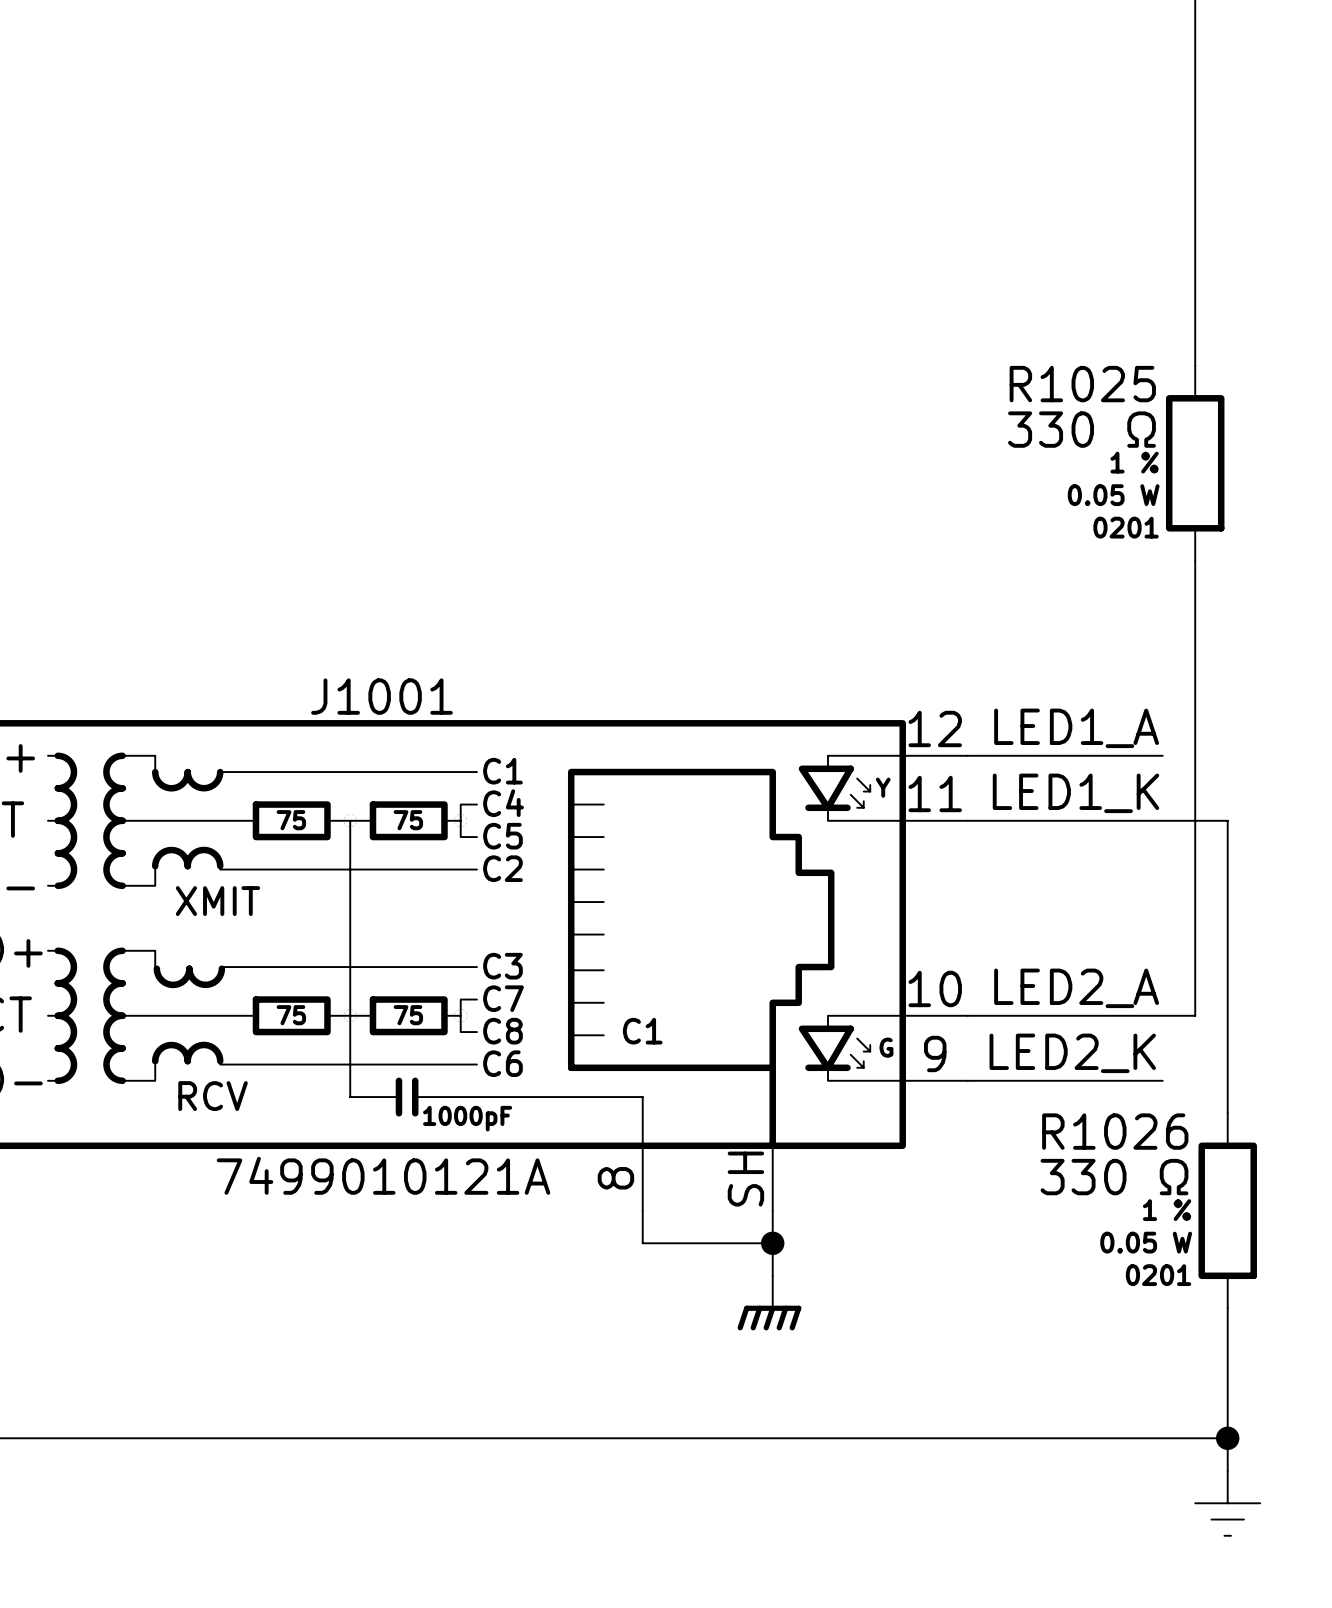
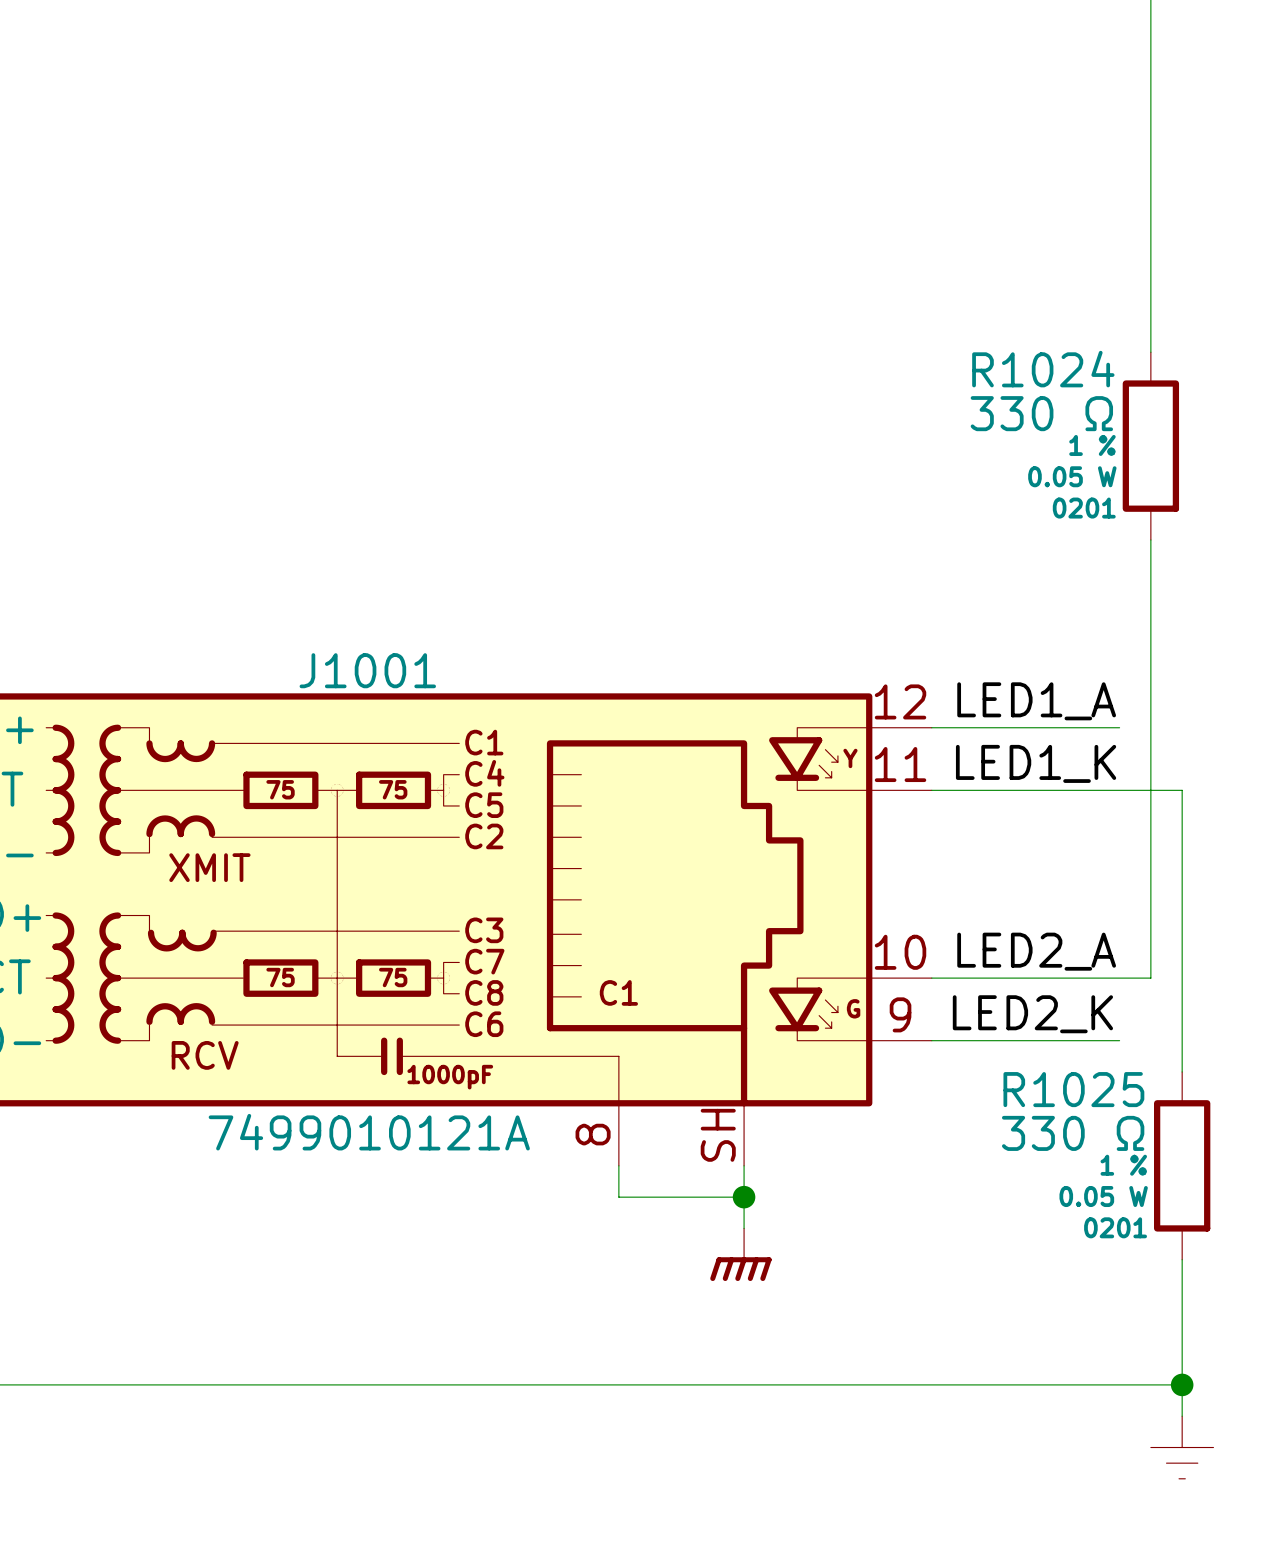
R1025 name: R1025 (1082, 384) -> R1024 (1043, 369)
R1026 name: R1026 (1115, 1131) -> R1025 (1073, 1089)

